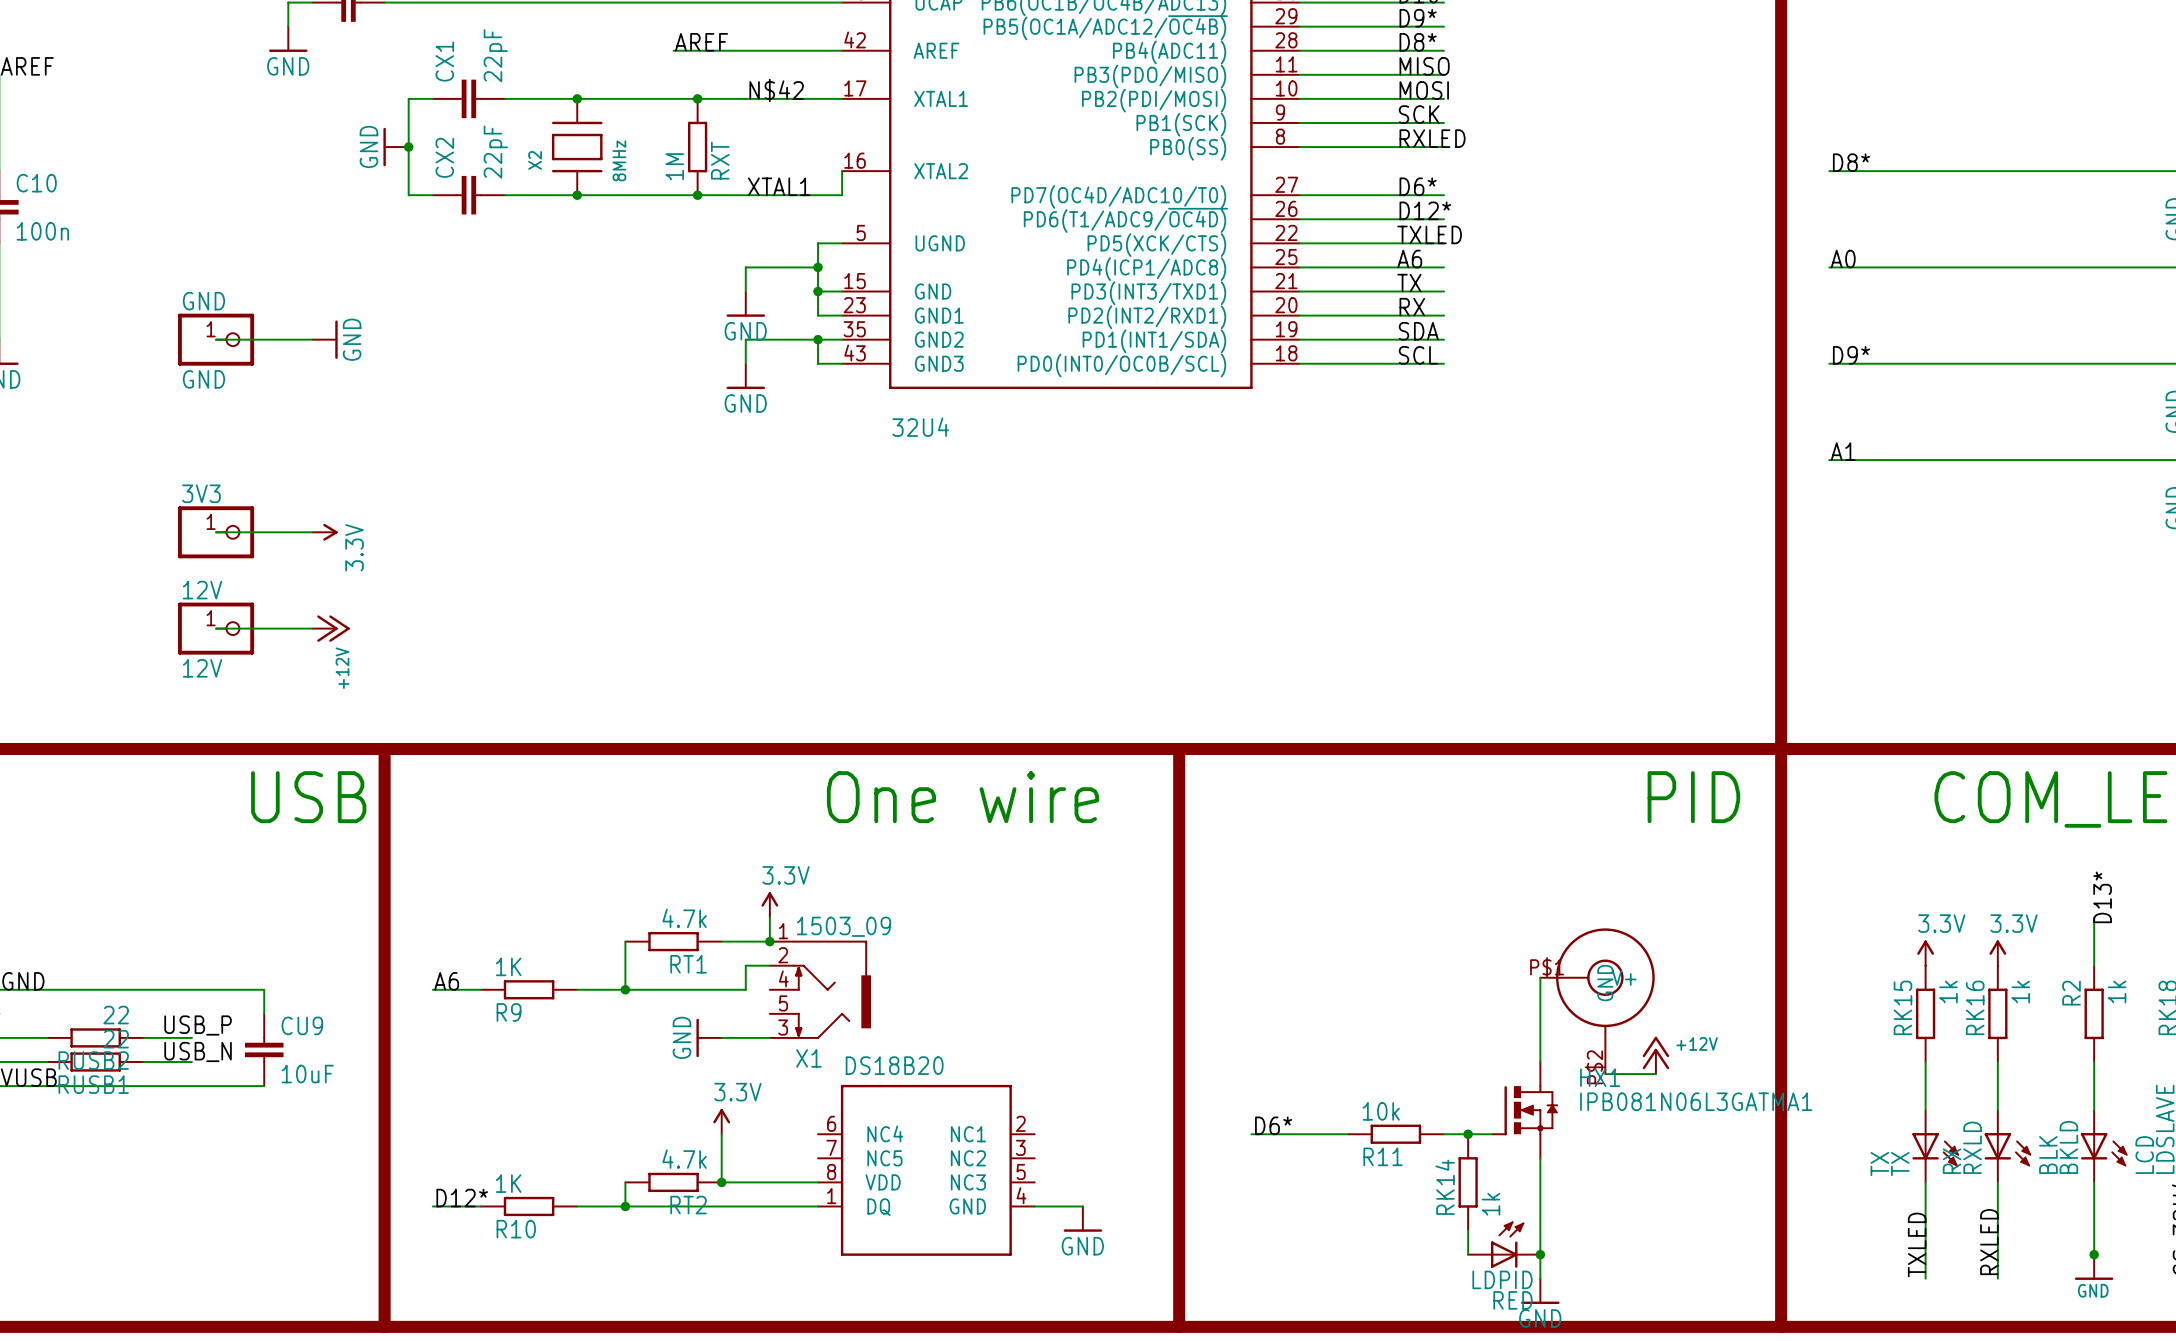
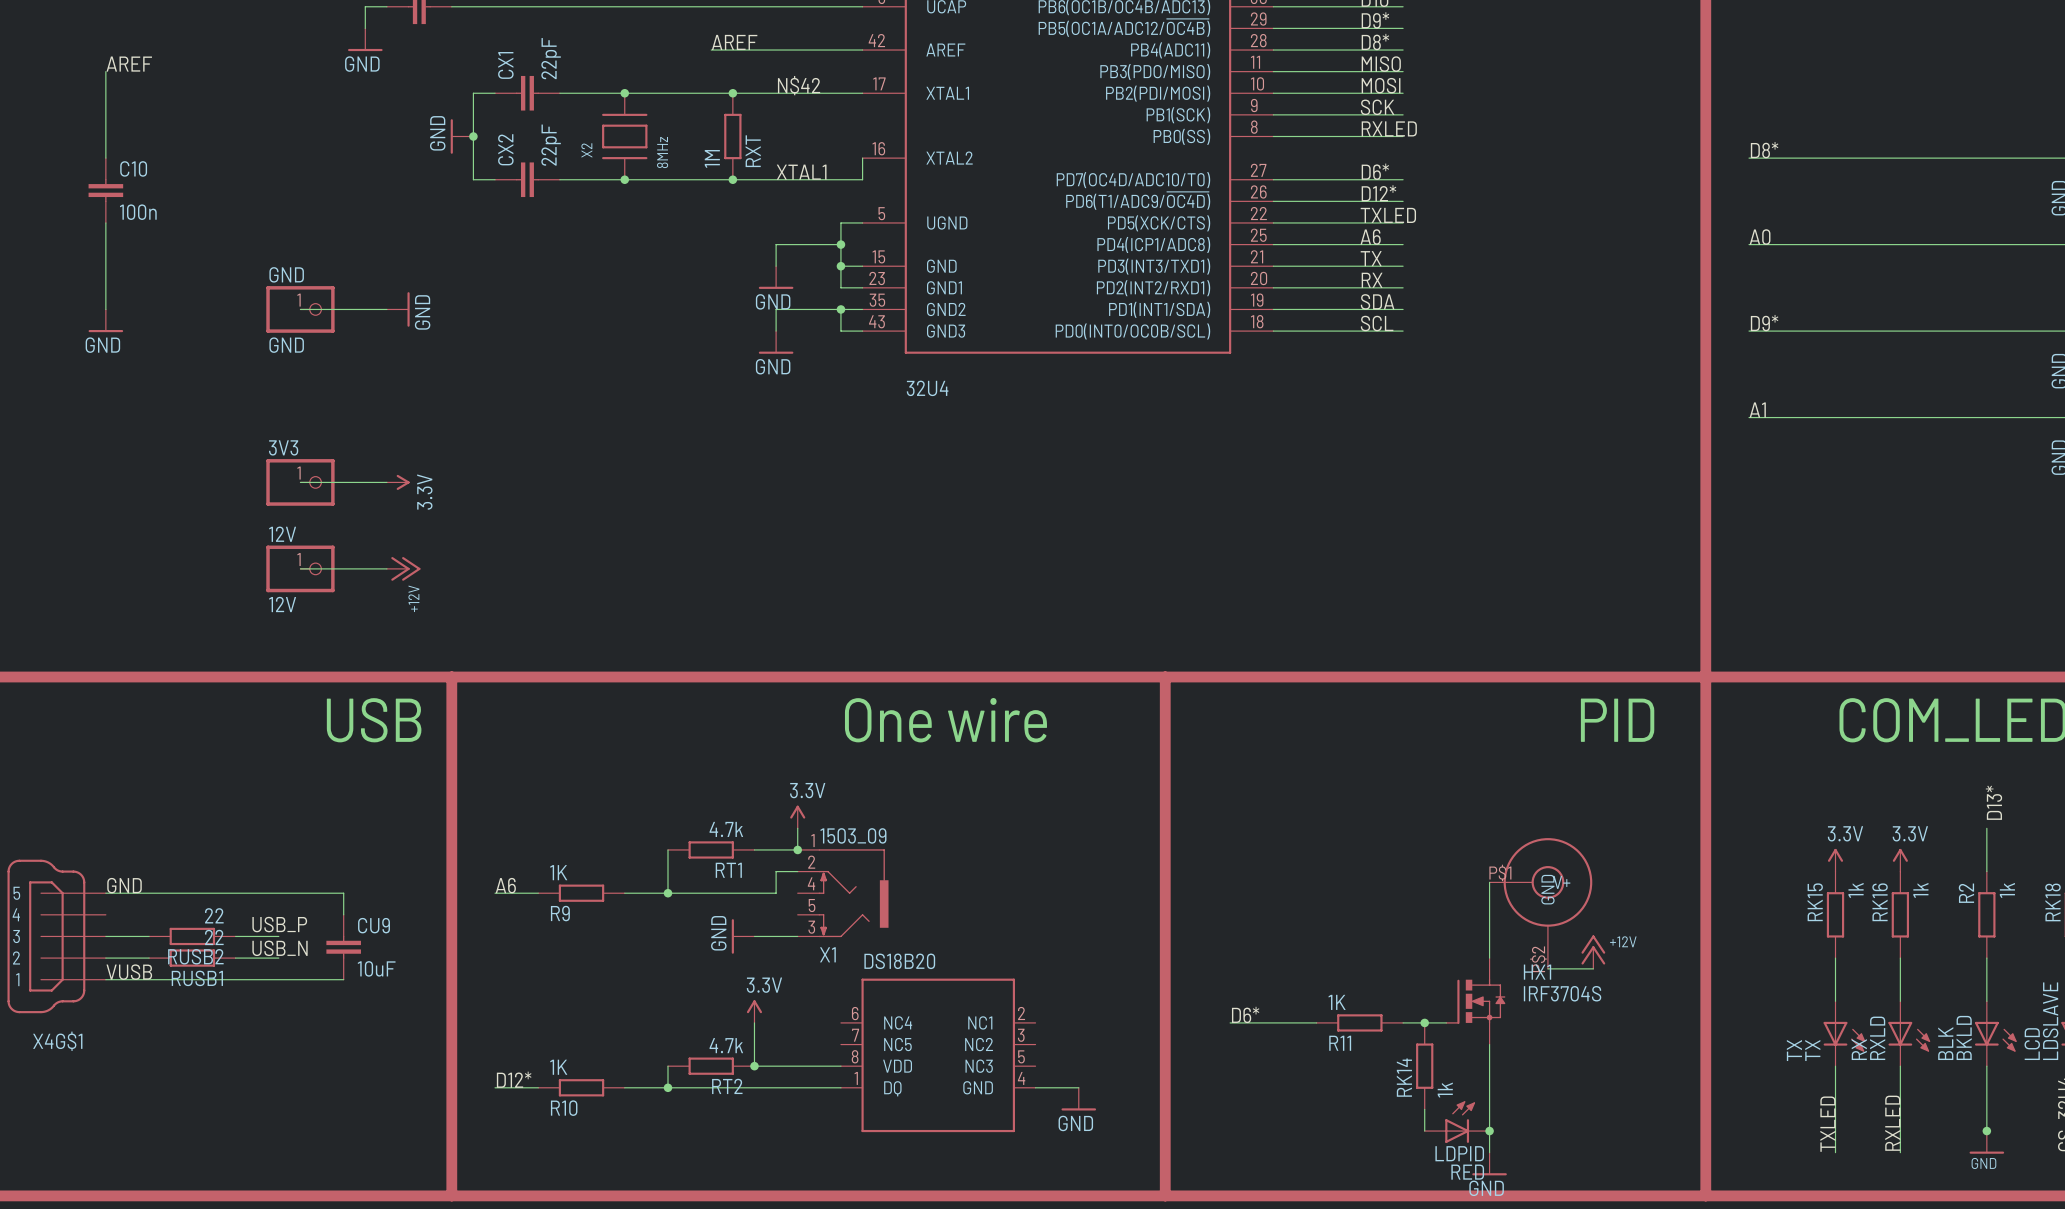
HX1 value: IPB081N06L3GATMA1 (1696, 1101) -> IRF3704S (1562, 993)
R11 value: 10k (1381, 1111) -> 1K (1337, 1002)

